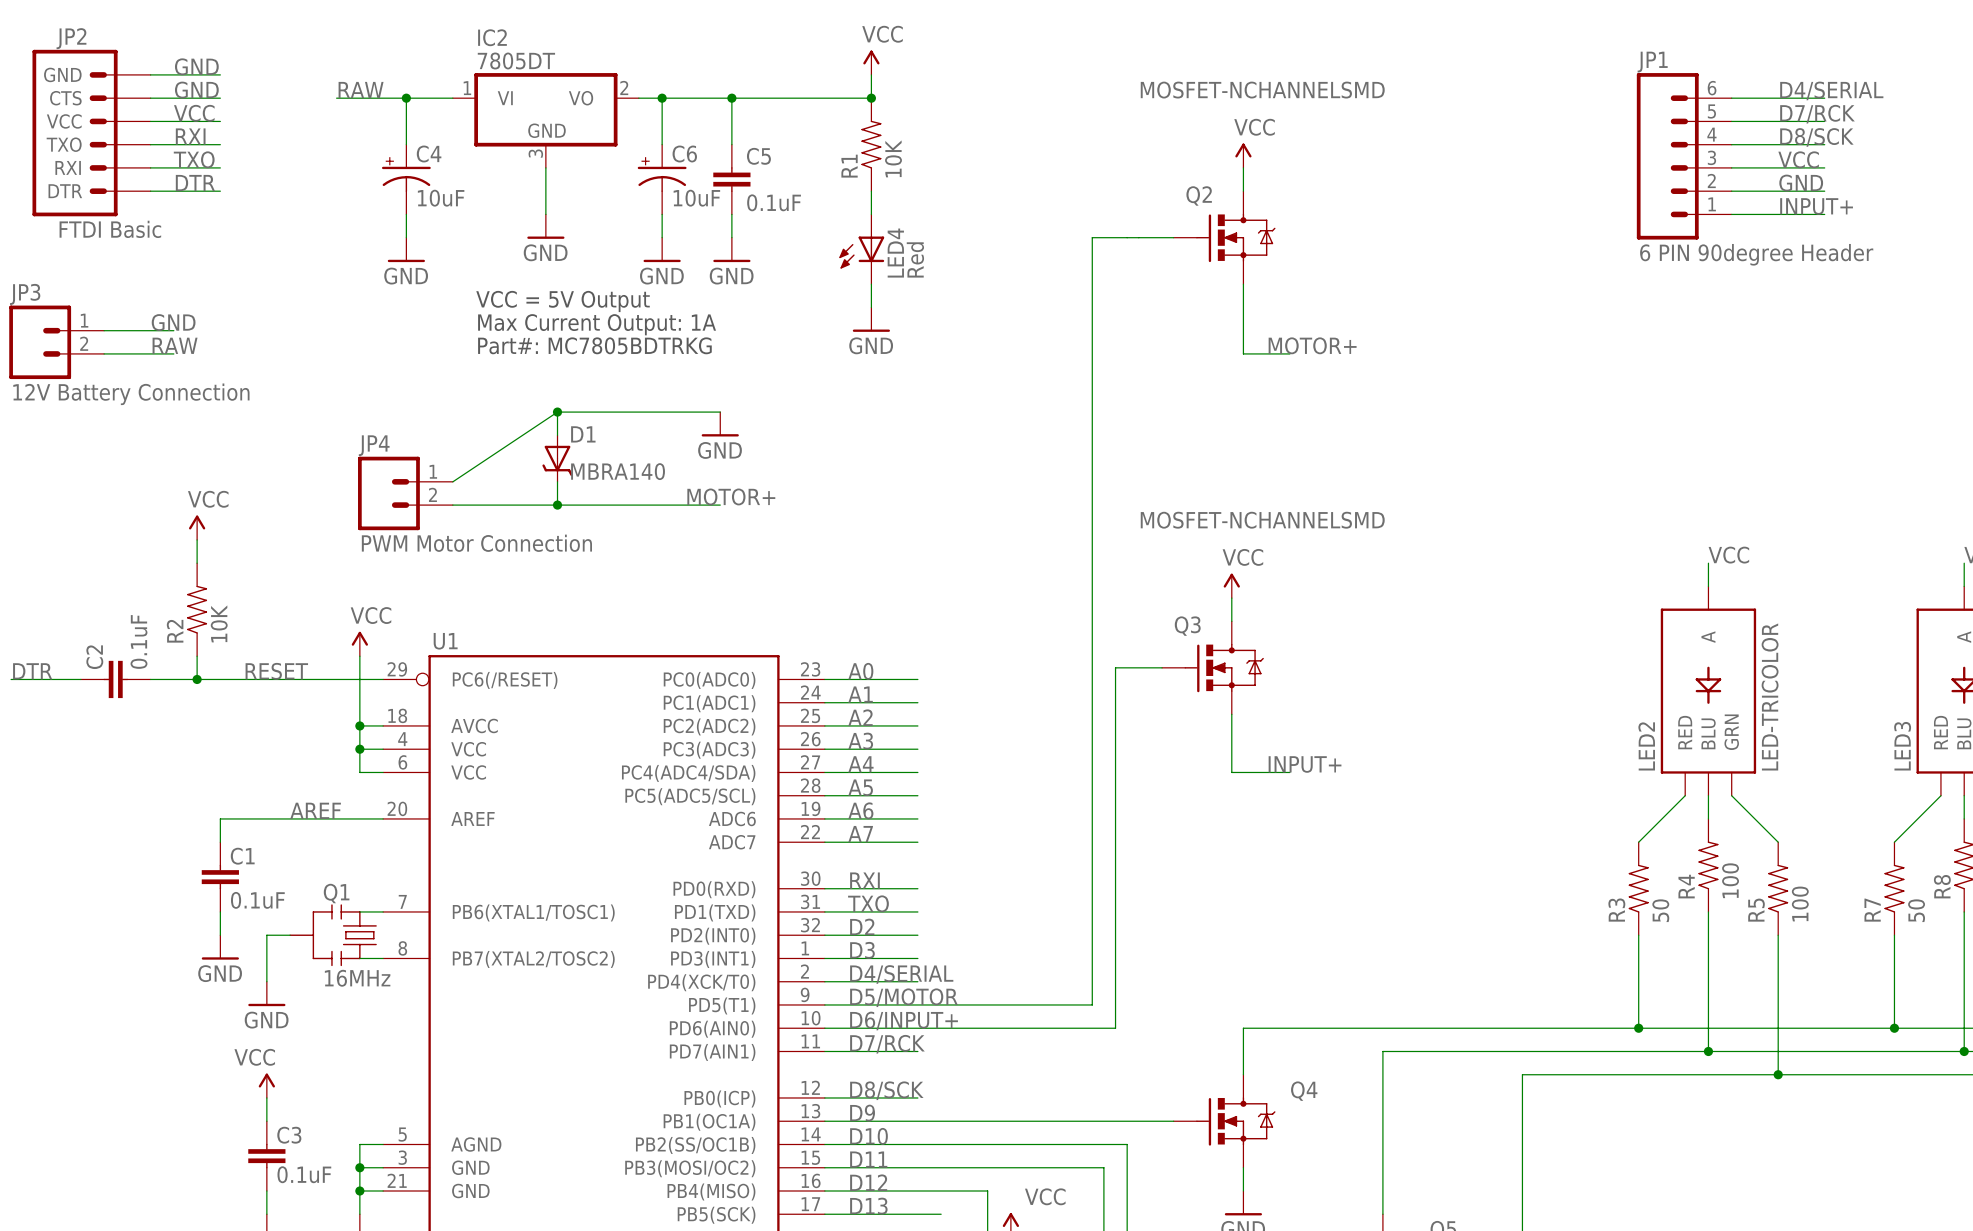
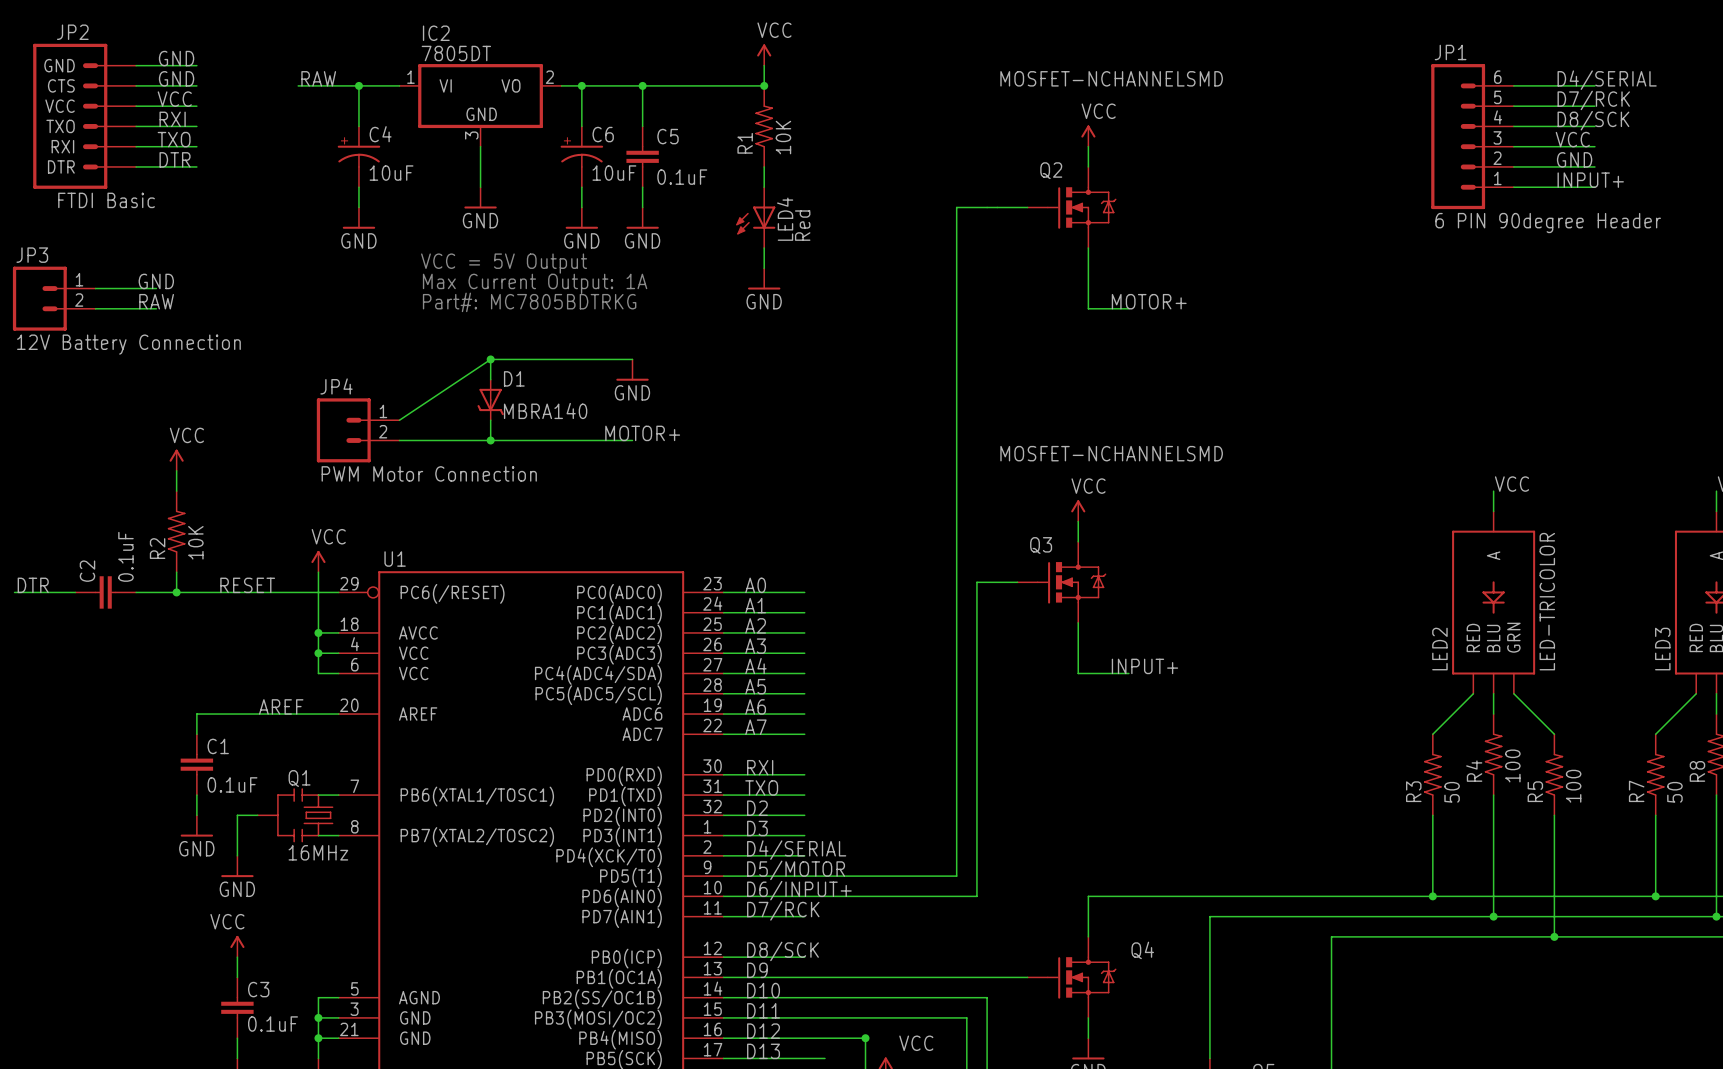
junction: none -> (865, 1038)

